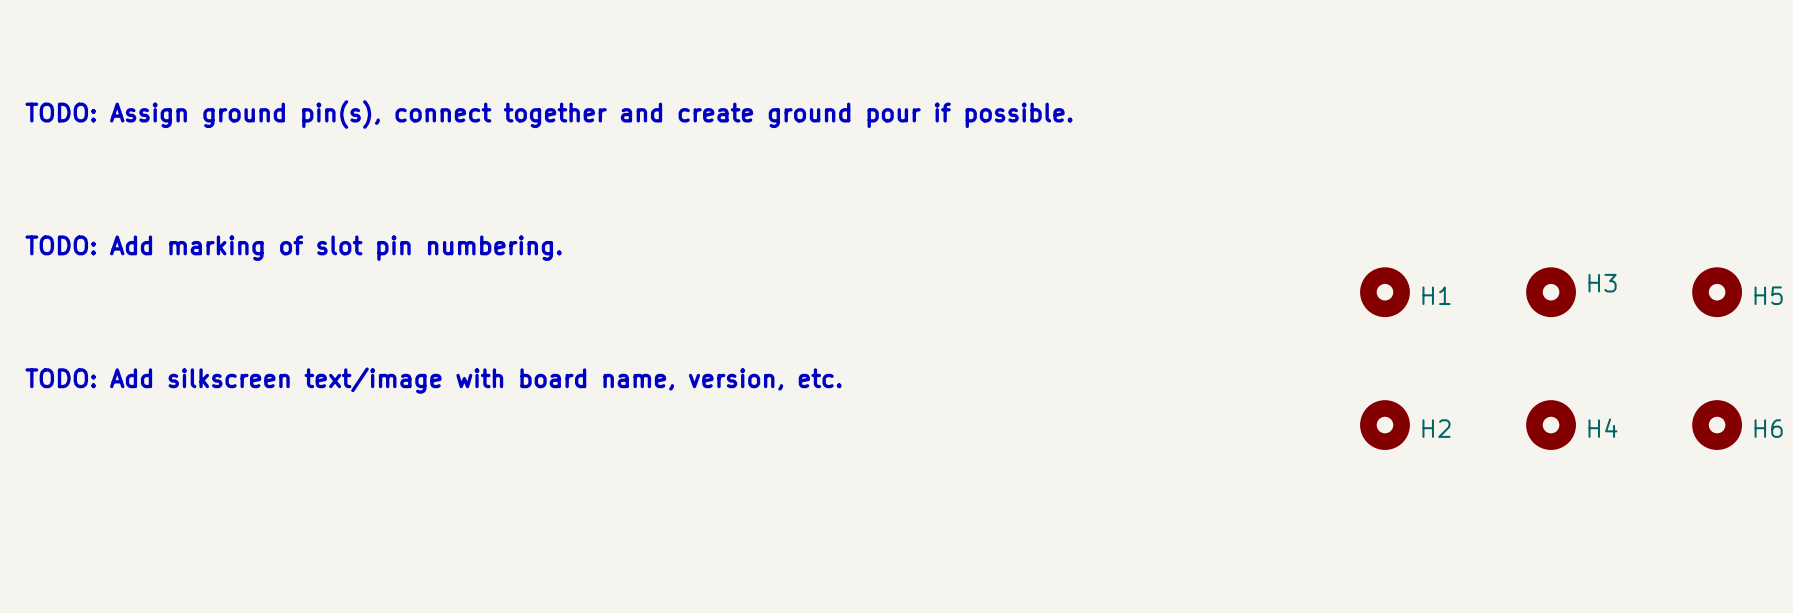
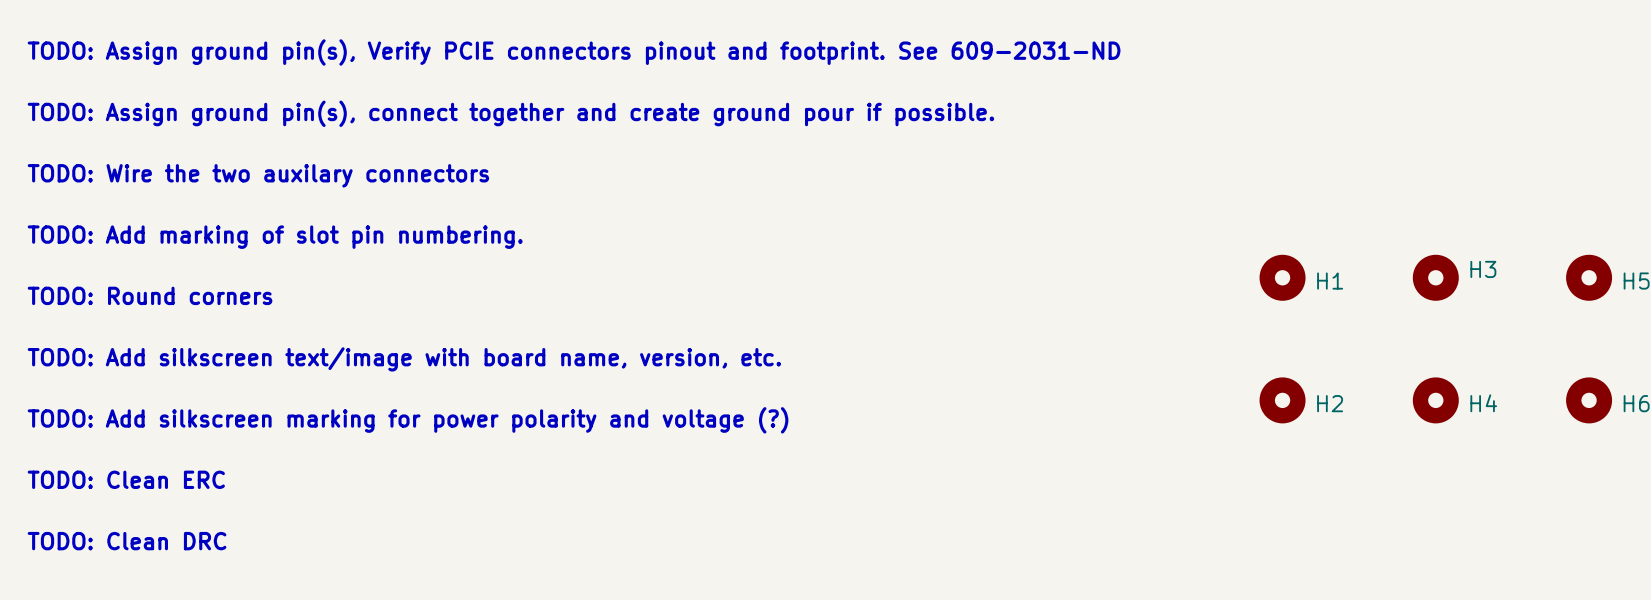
text: none -> TODO: Assign ground pin(s), Verify PCIE connectors pinout and footprint. See 609-2031-ND (574, 52)
text: none -> TODO: Wire the two auxilary connectors (258, 175)
text: none -> TODO: Round corners (150, 295)
text: none -> TODO: Add silkscreen marking for power polarity and voltage (?) (408, 420)
text: none -> TODO: Clean ERC (126, 479)
text: none -> TODO: Clean DRC (127, 541)

